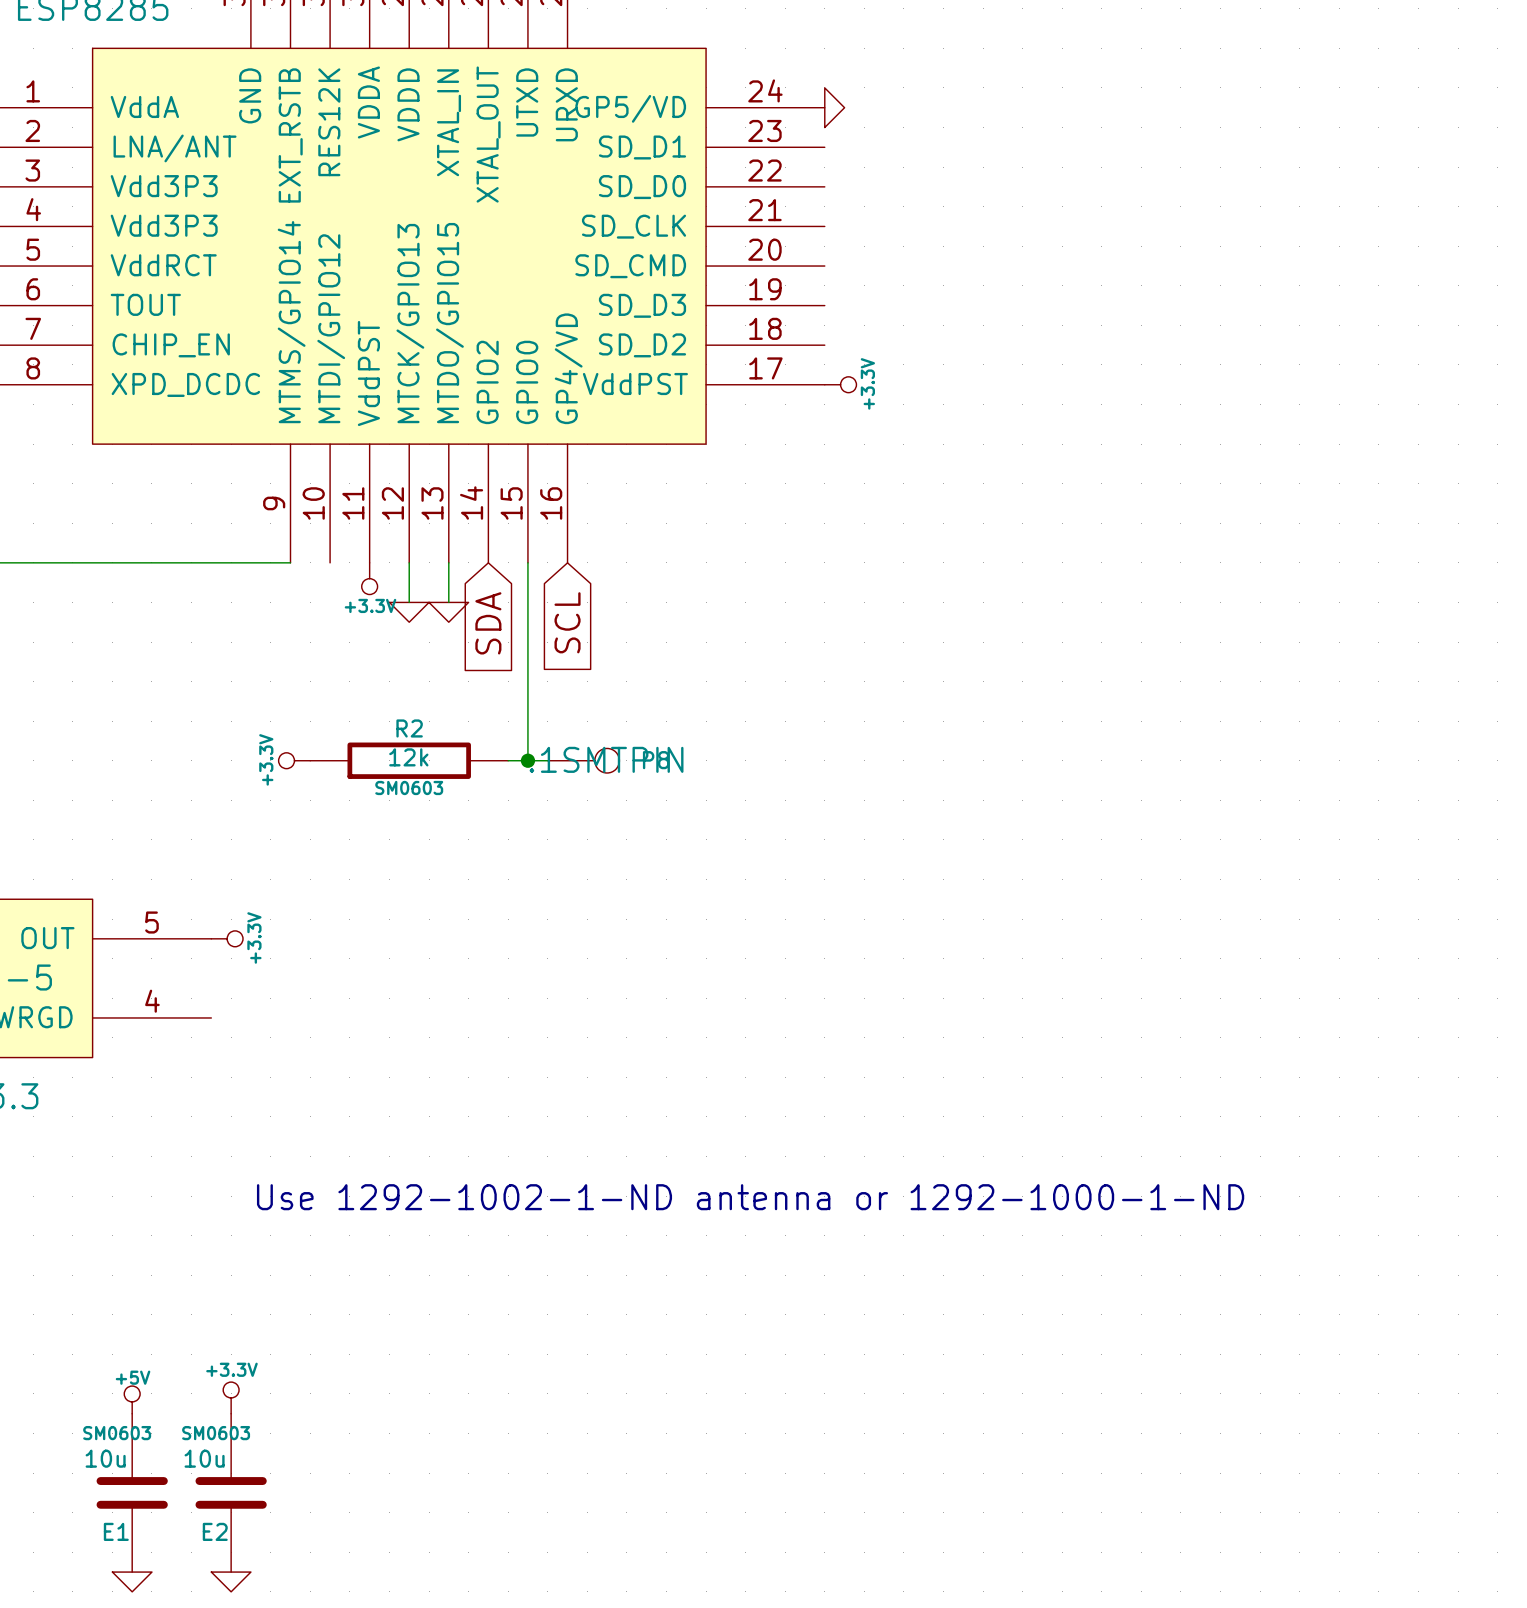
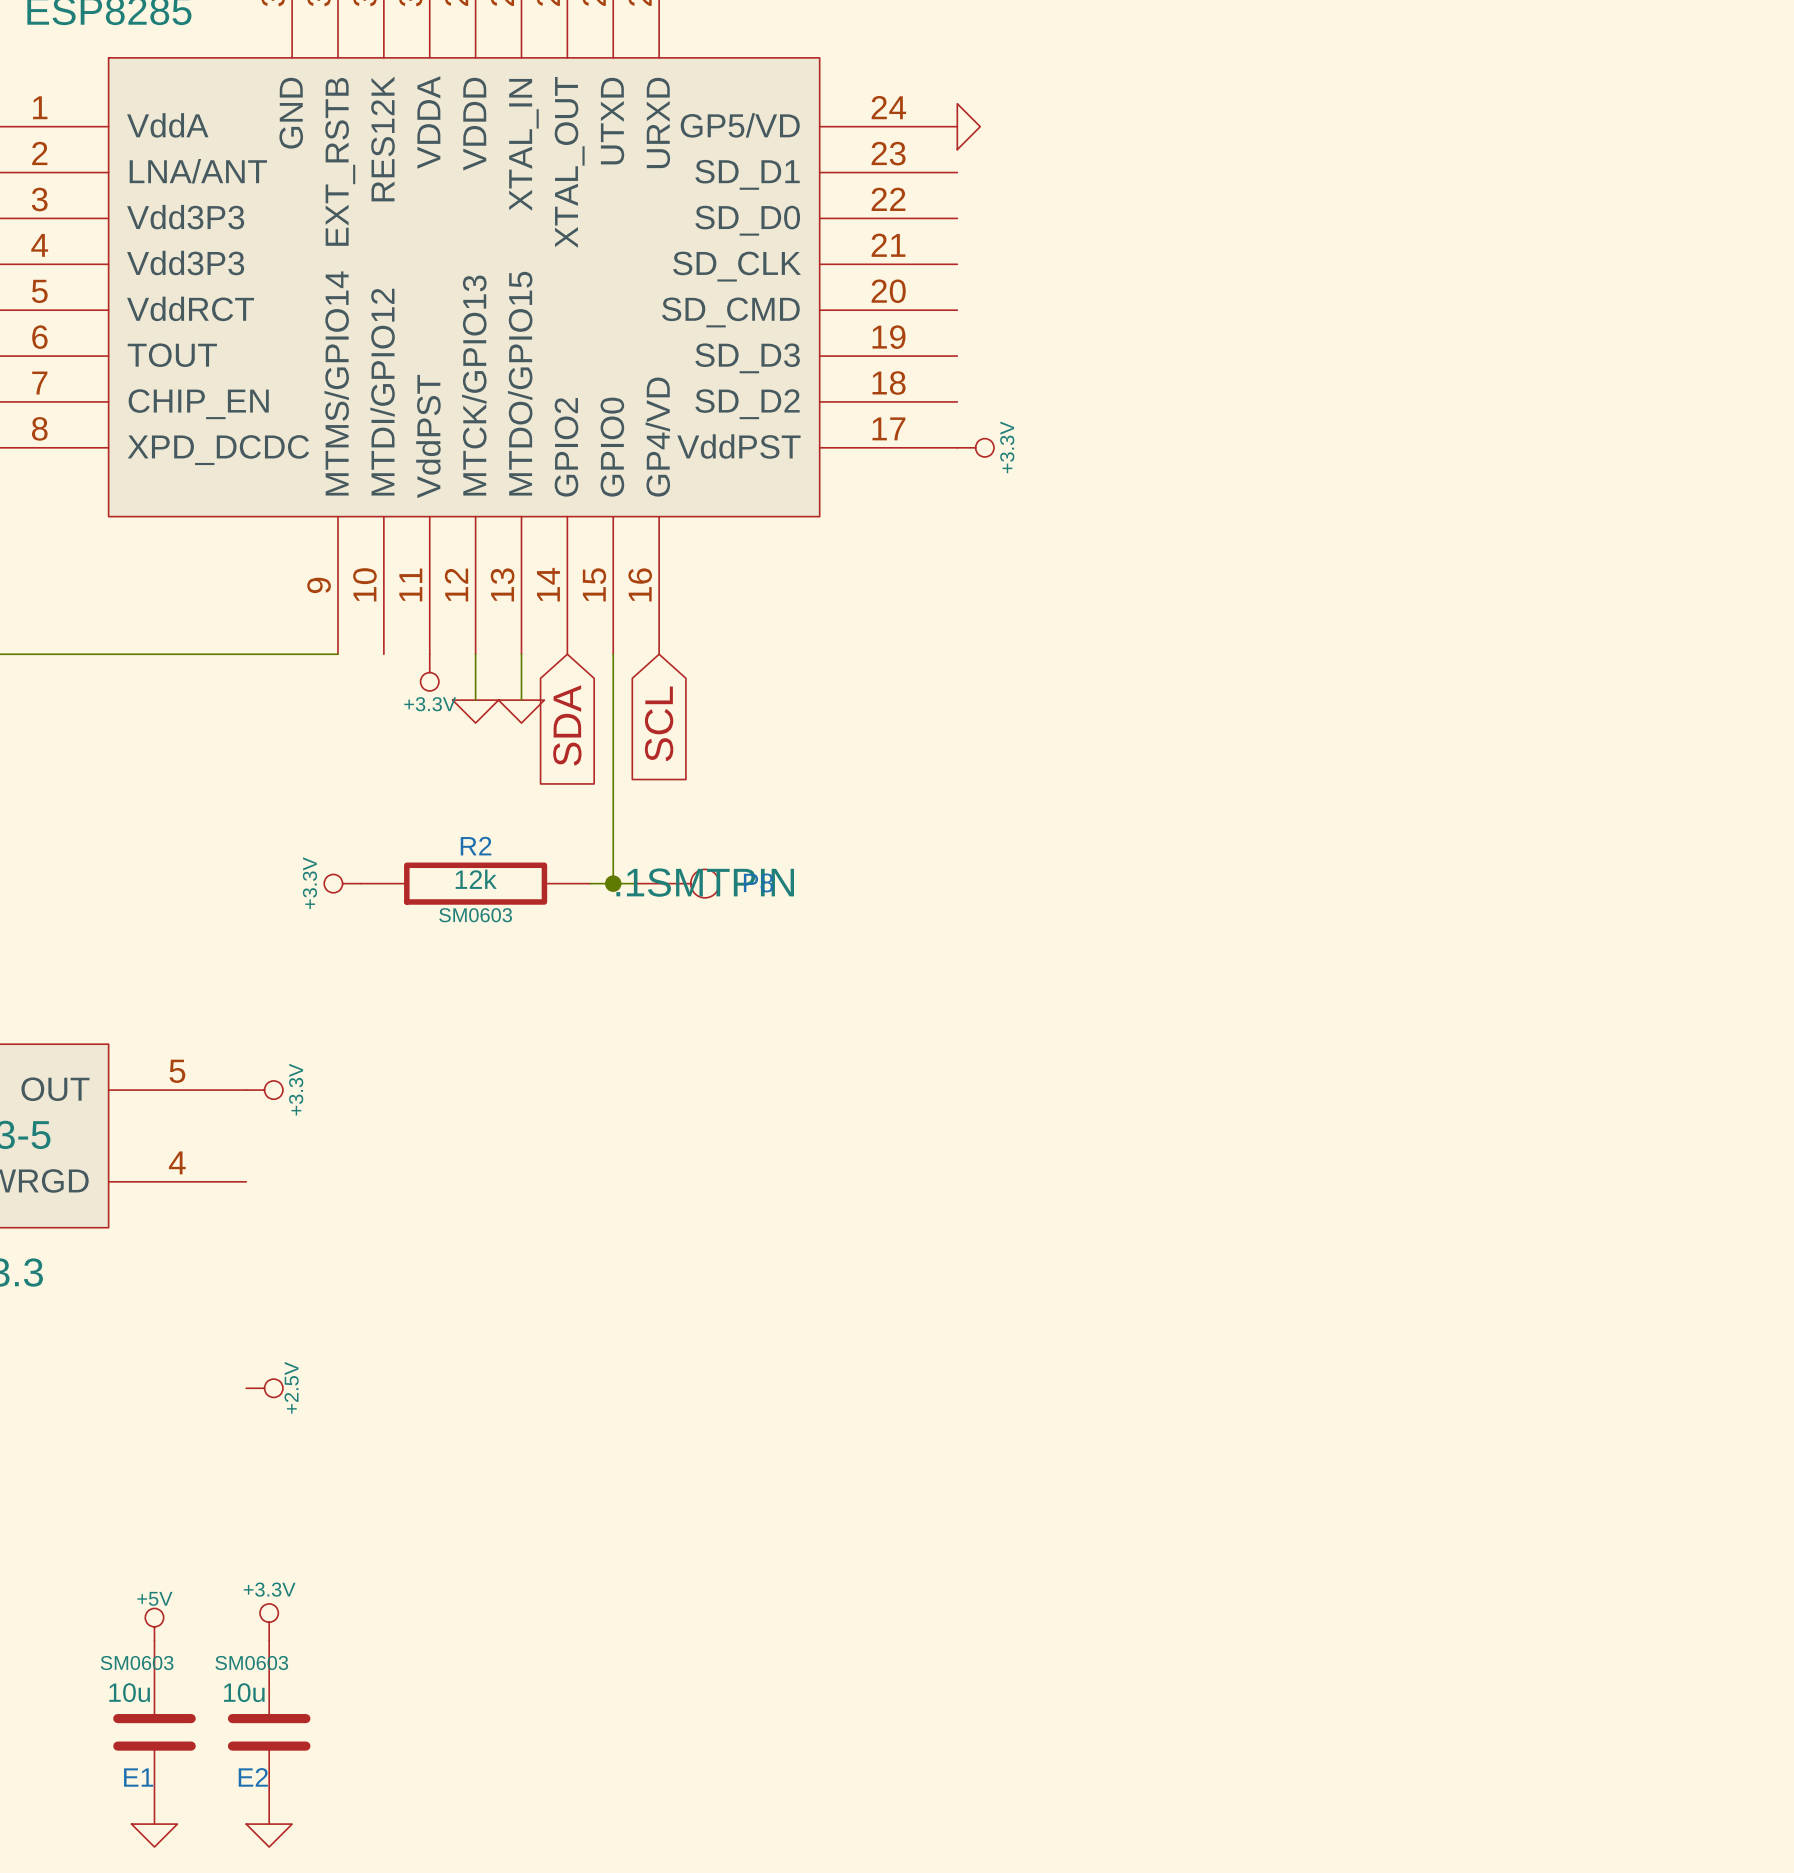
power symbol: none -> +2.5V (264, 1388)
text: Use 1292-1002-1-ND antenna or 1292-1000-1-ND (750, 1197) -> none

